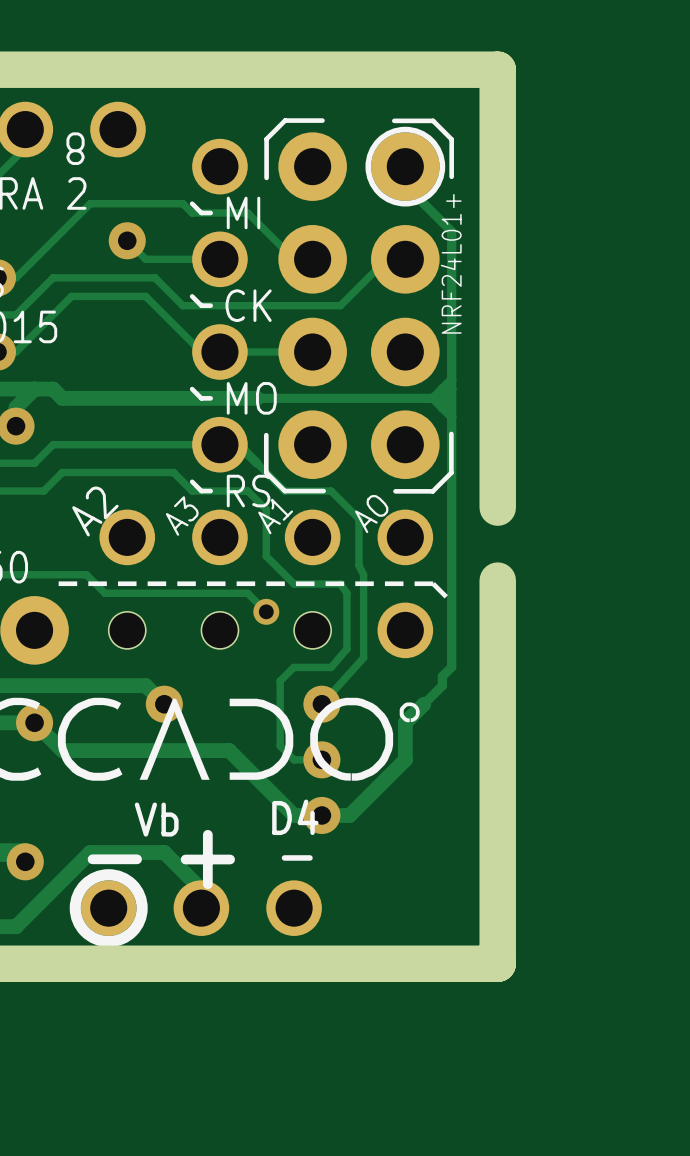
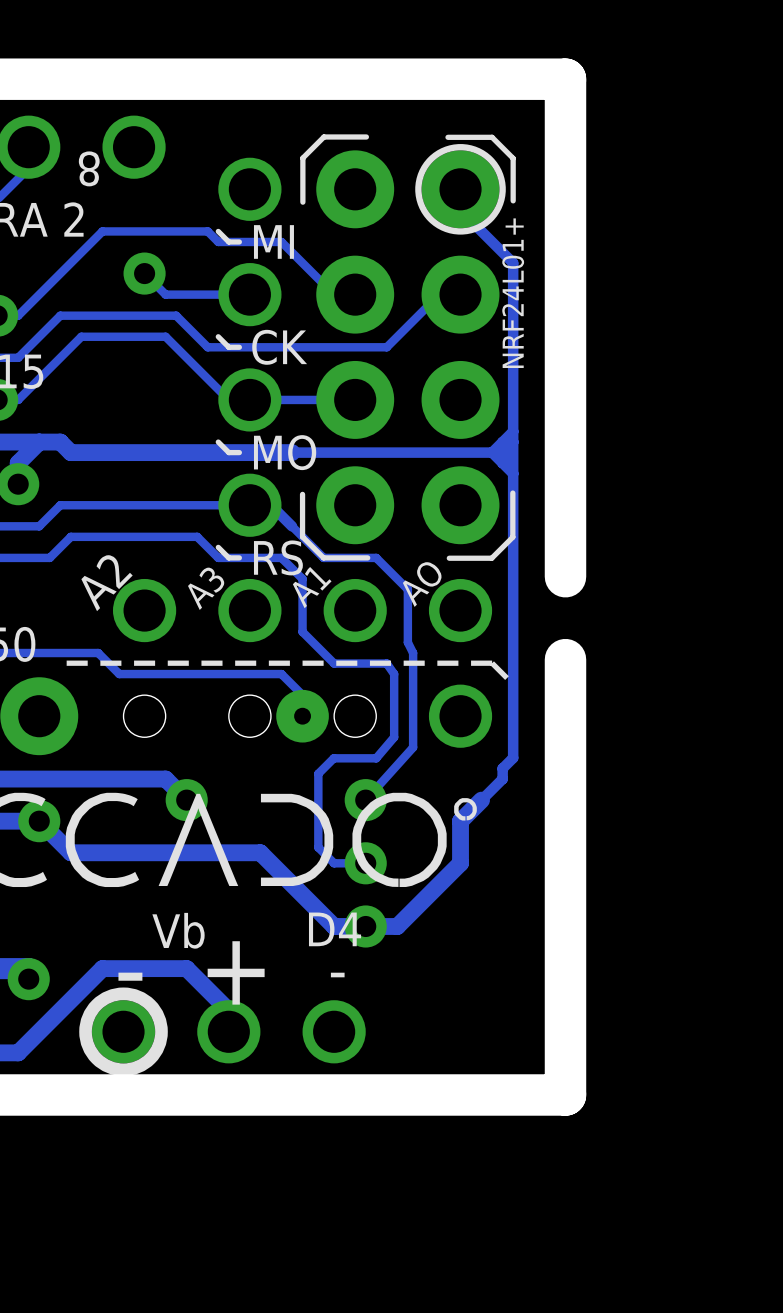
via size: [253, 598, 280, 625] -> [276, 689, 329, 743]

